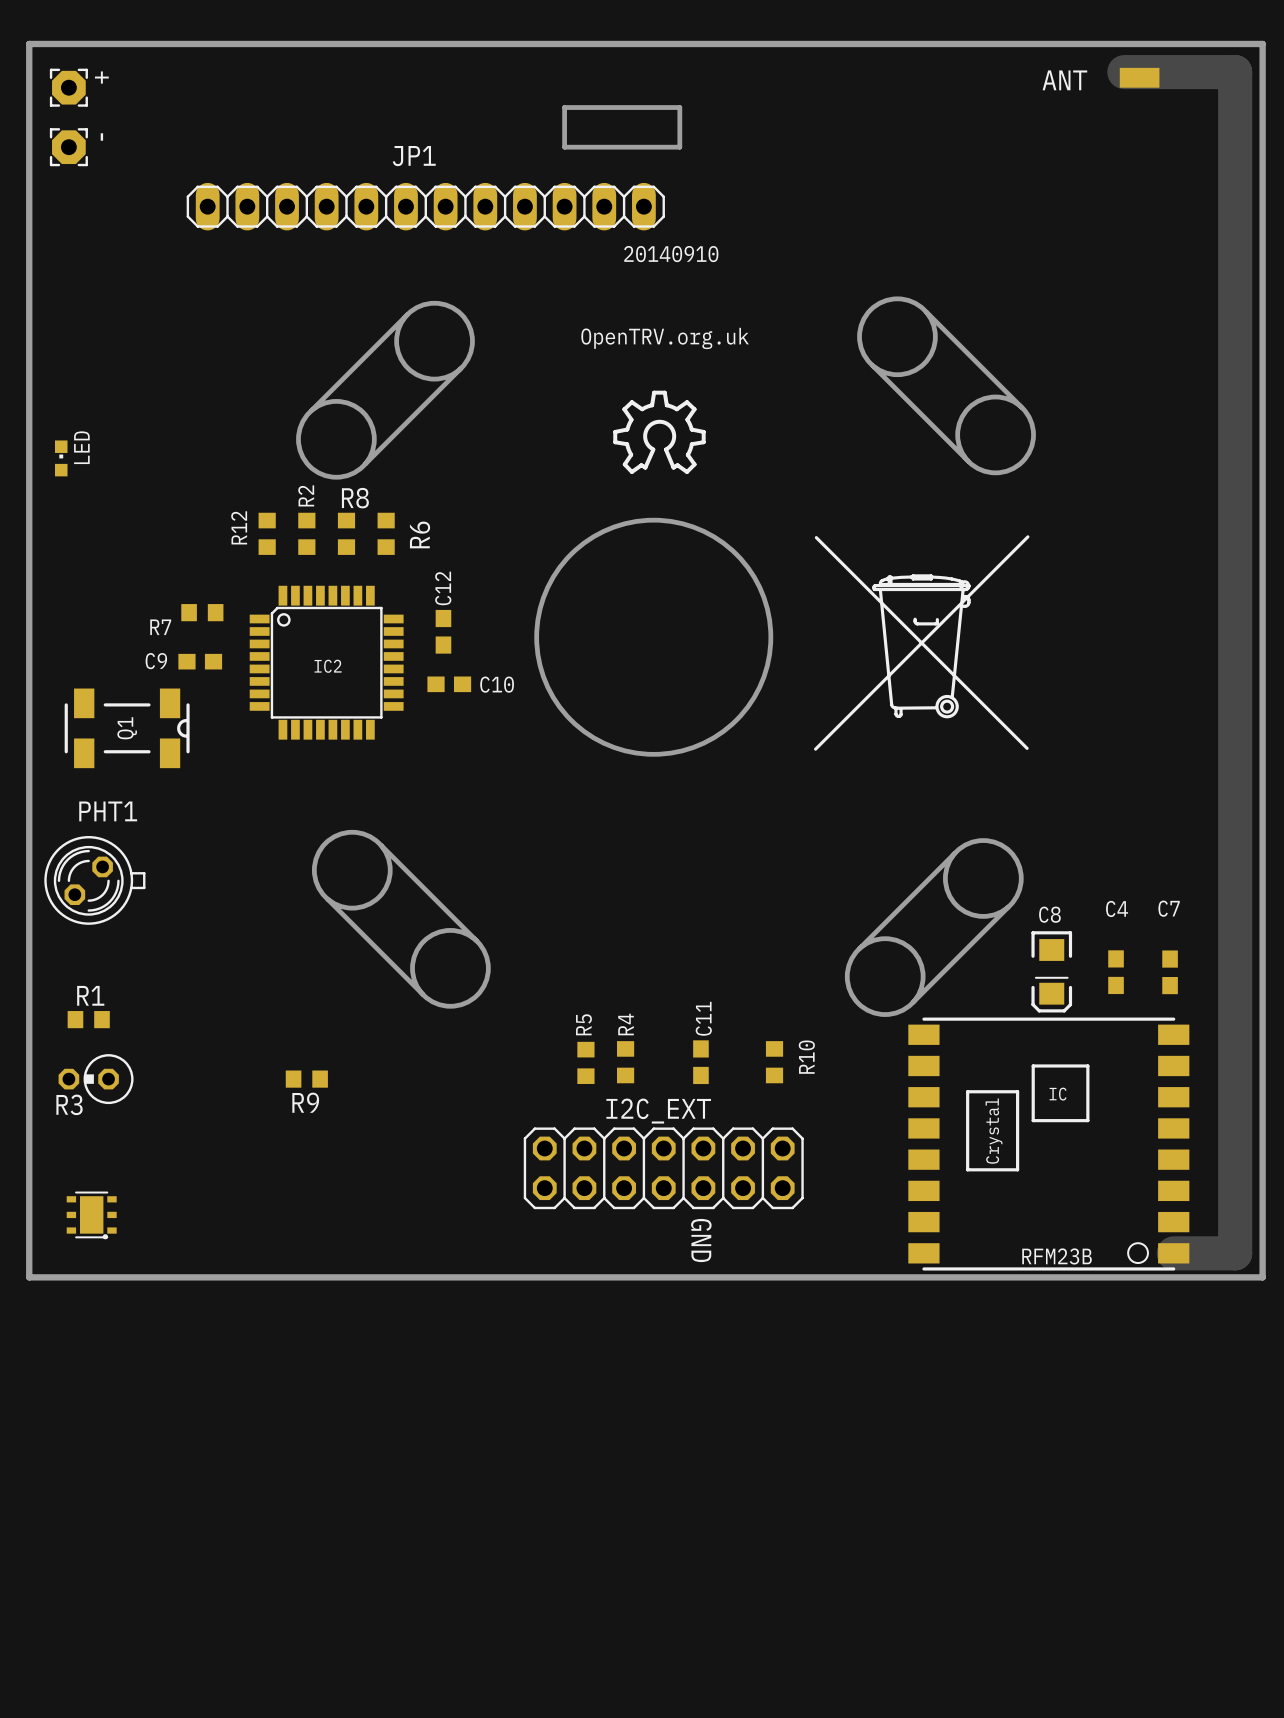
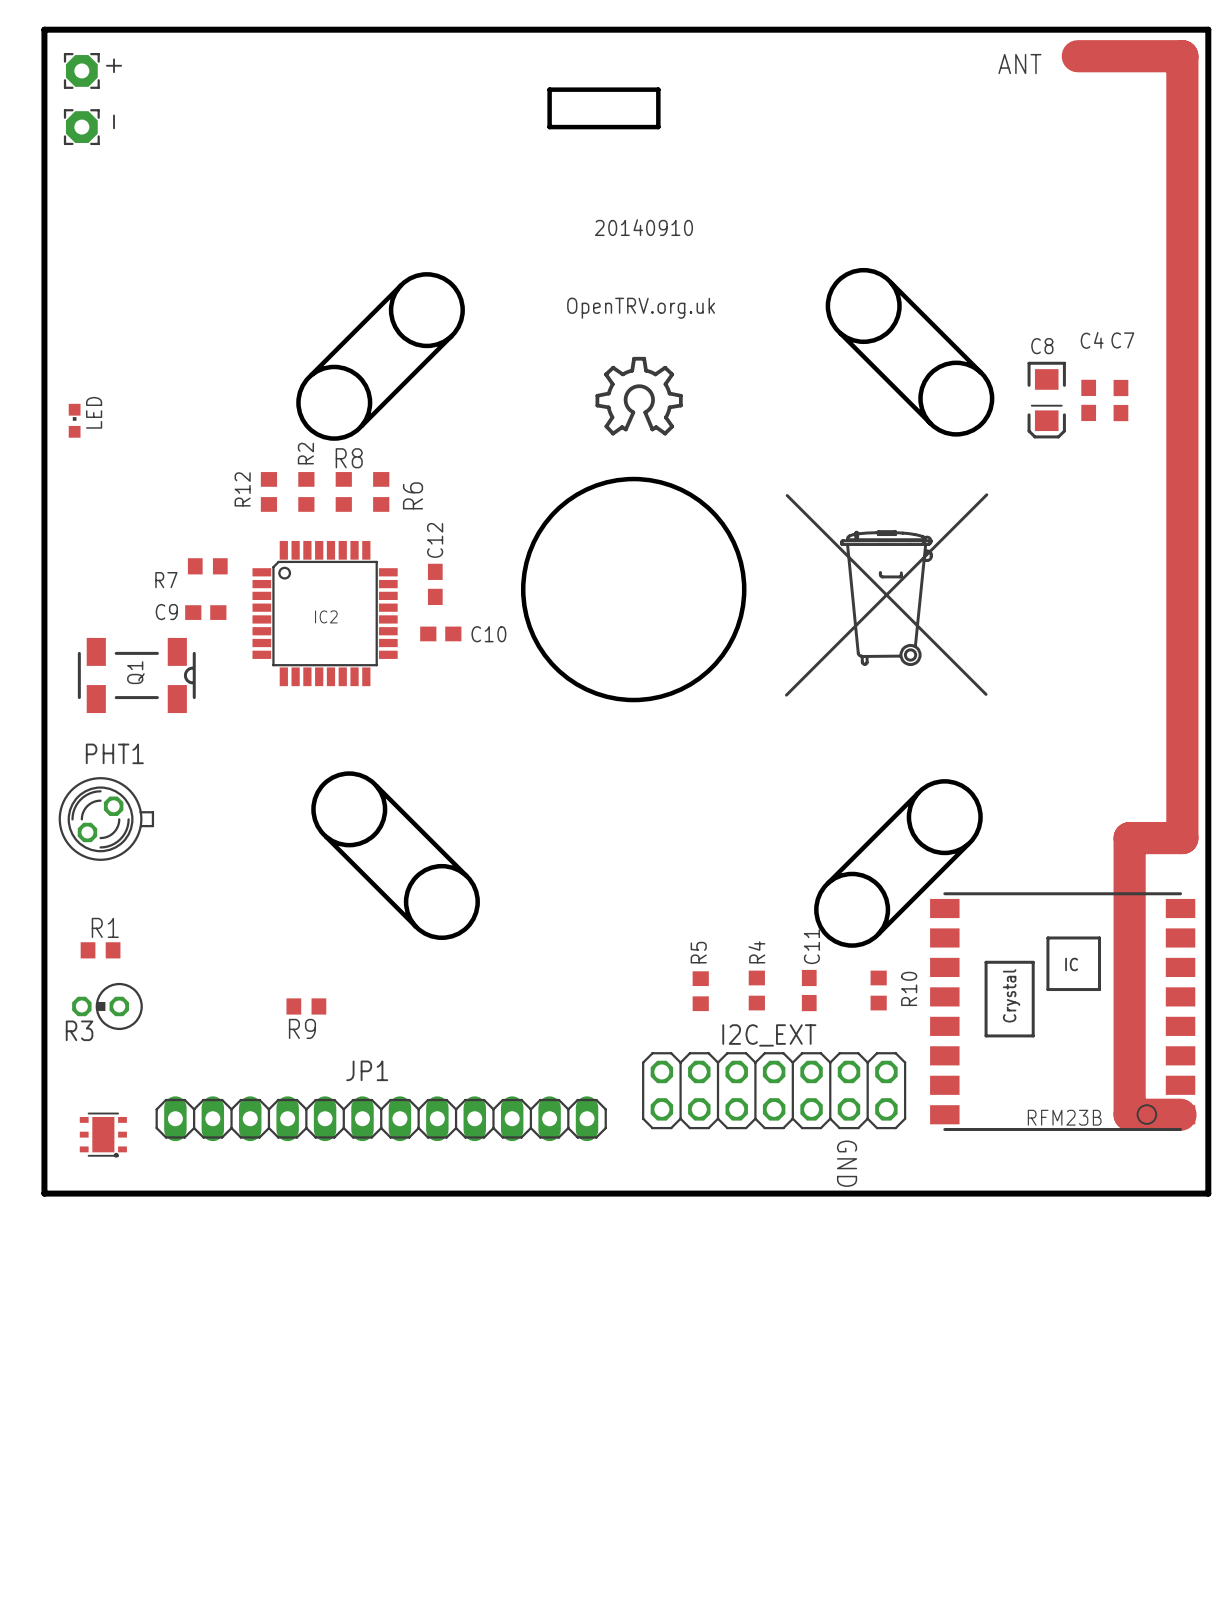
JP1 position: (425, 206) -> (381, 1118)
track: (1235, 900) (1235, 1253) (1173, 1253) -> (1182, 838) (1129, 838) (1129, 1114) (1180, 1114)
C8 position: (1051, 971) -> (1046, 400)
C4 position: (1116, 972) -> (1088, 400)
C7 position: (1170, 972) -> (1120, 400)
R5 position: (585, 1062) -> (700, 991)
R4 position: (625, 1062) -> (756, 990)
C11 position: (700, 1062) -> (809, 990)
R10 position: (774, 1062) -> (878, 990)
RFM23B position: (1048, 1144) -> (1062, 1011)
I2C_EXT position: (663, 1168) -> (774, 1090)
text position: GND (701, 1240) -> GND (847, 1163)

